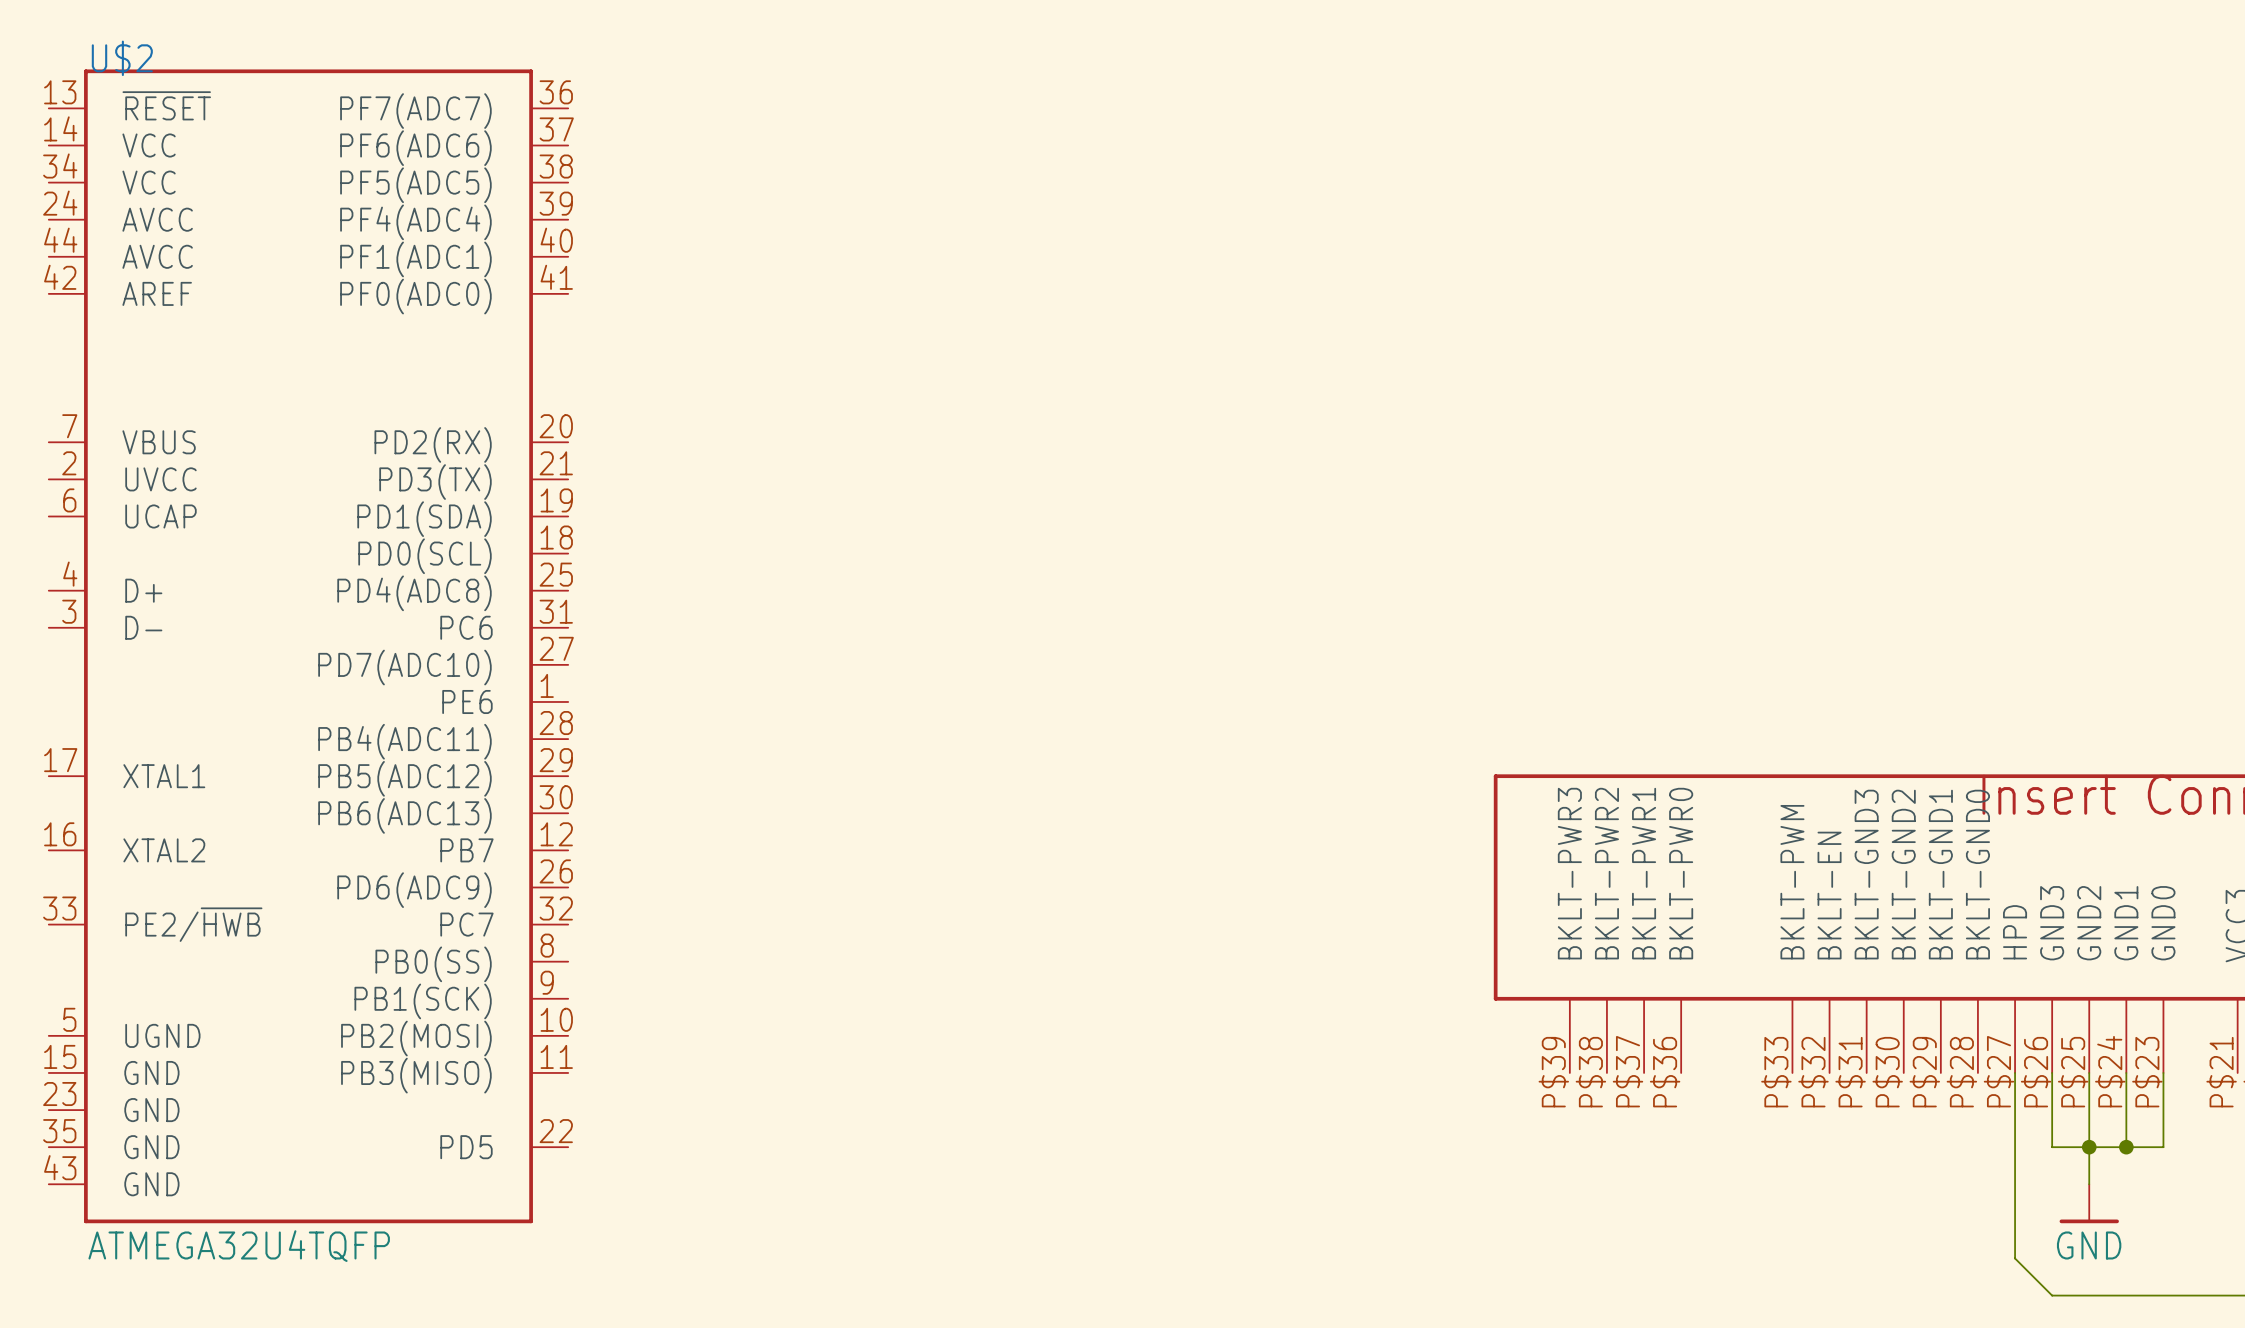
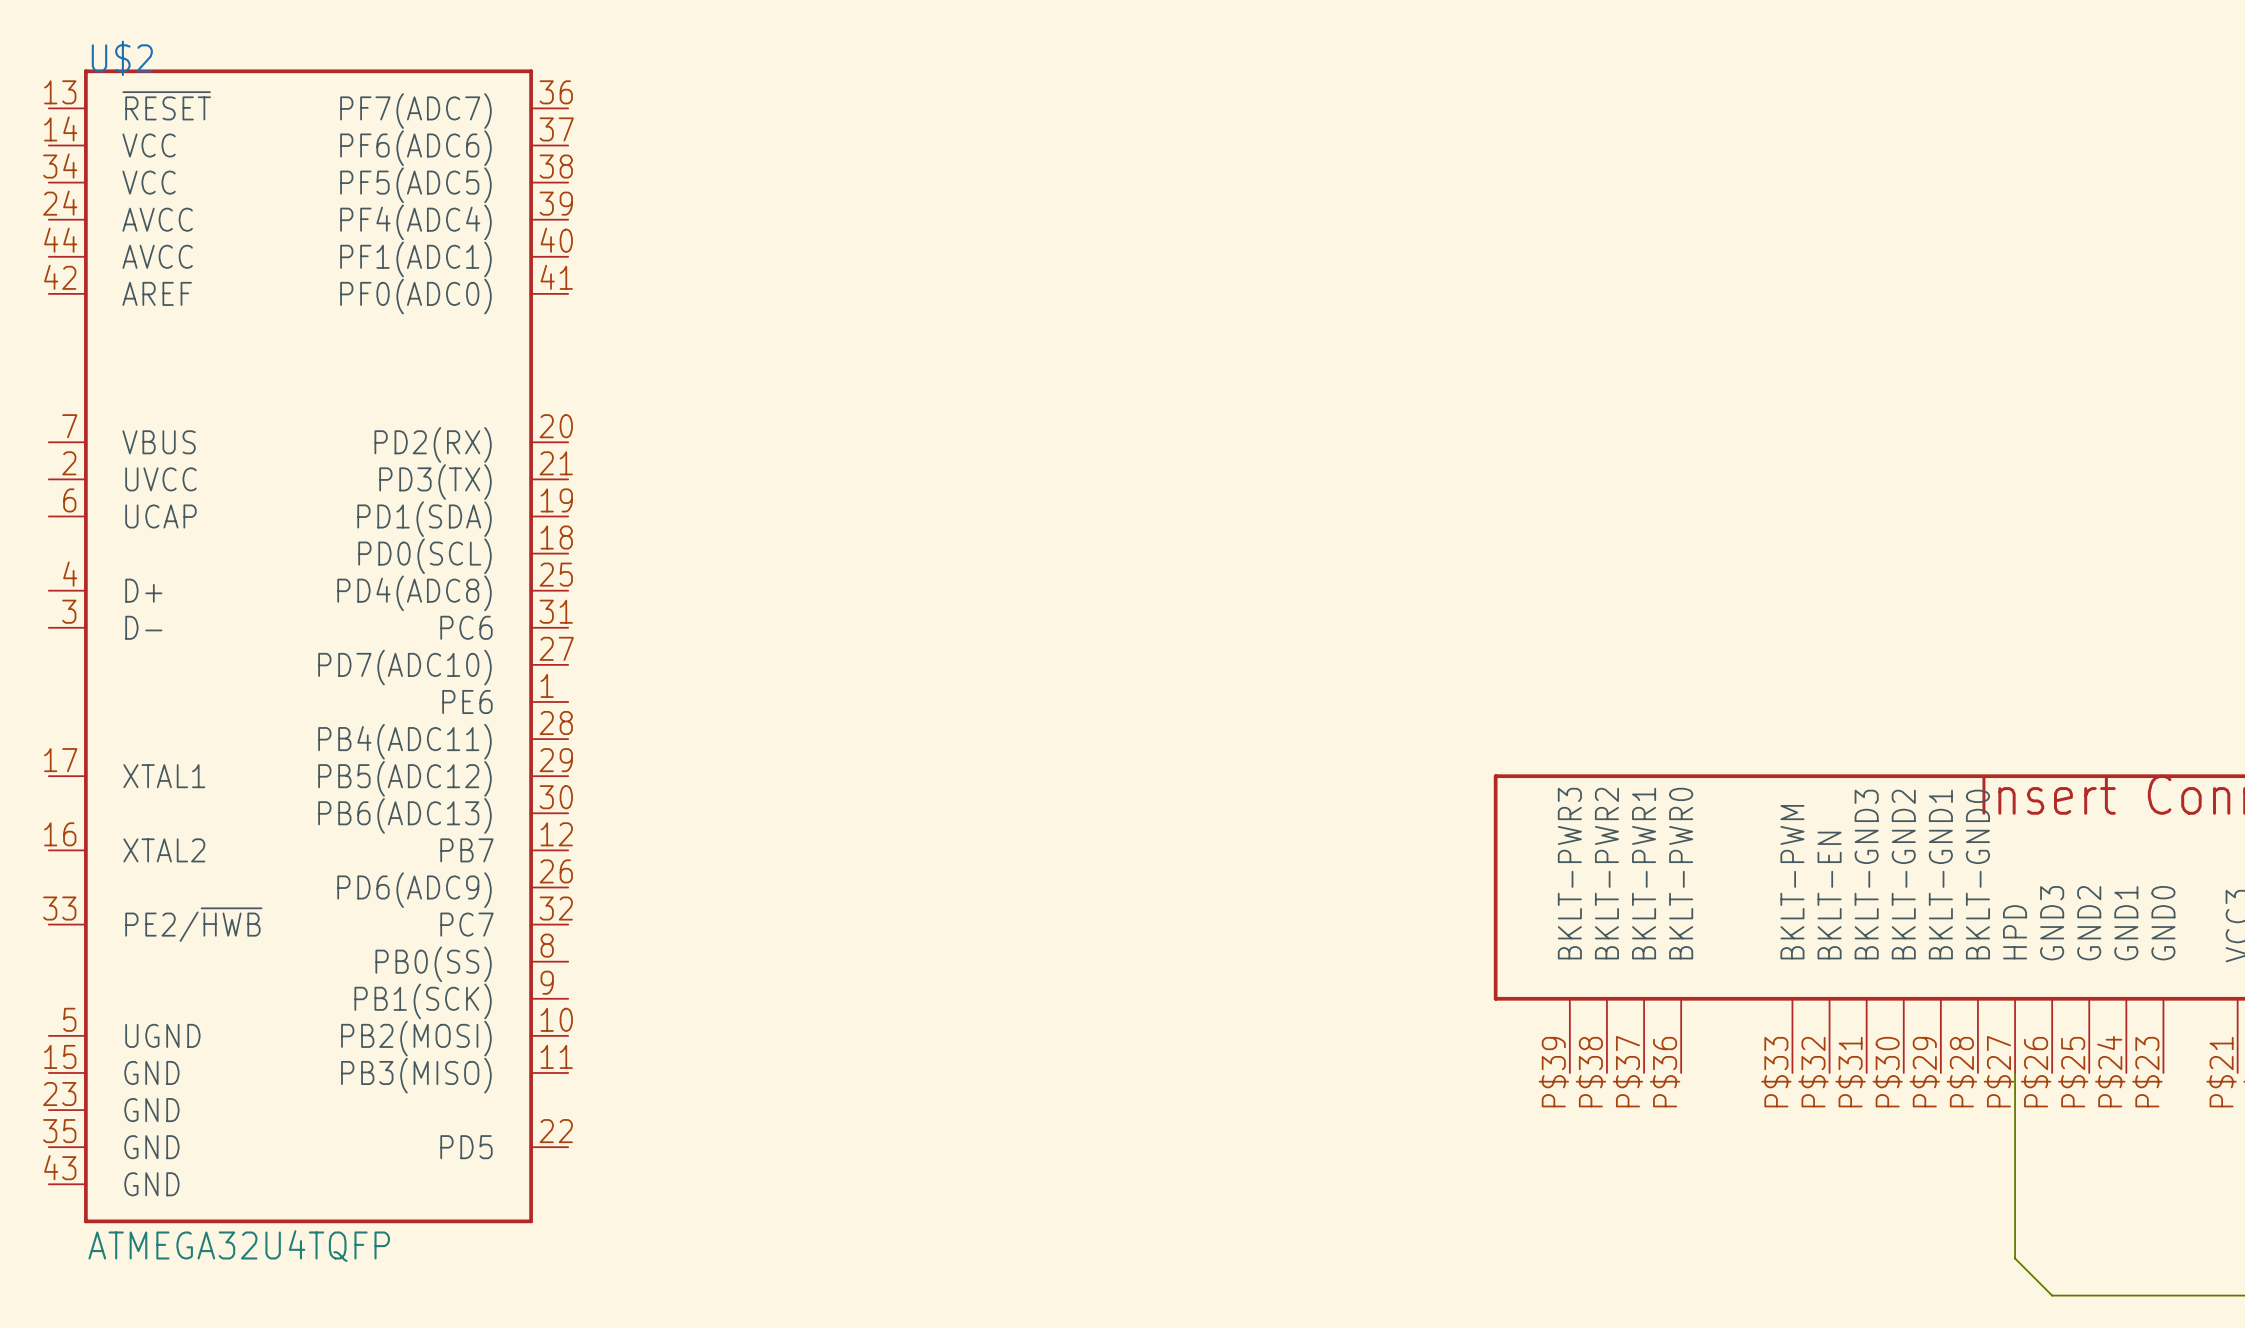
wire: (2052, 1072) (2052, 1147) (2163, 1147) (2163, 1072) -> none
wire: (2089, 1072) (2089, 1184) -> none
wire: (2126, 1072) (2126, 1147) -> none
junction: (2089, 1147) -> none
junction: (2126, 1147) -> none
power symbol: GND (2089, 1203) -> none

